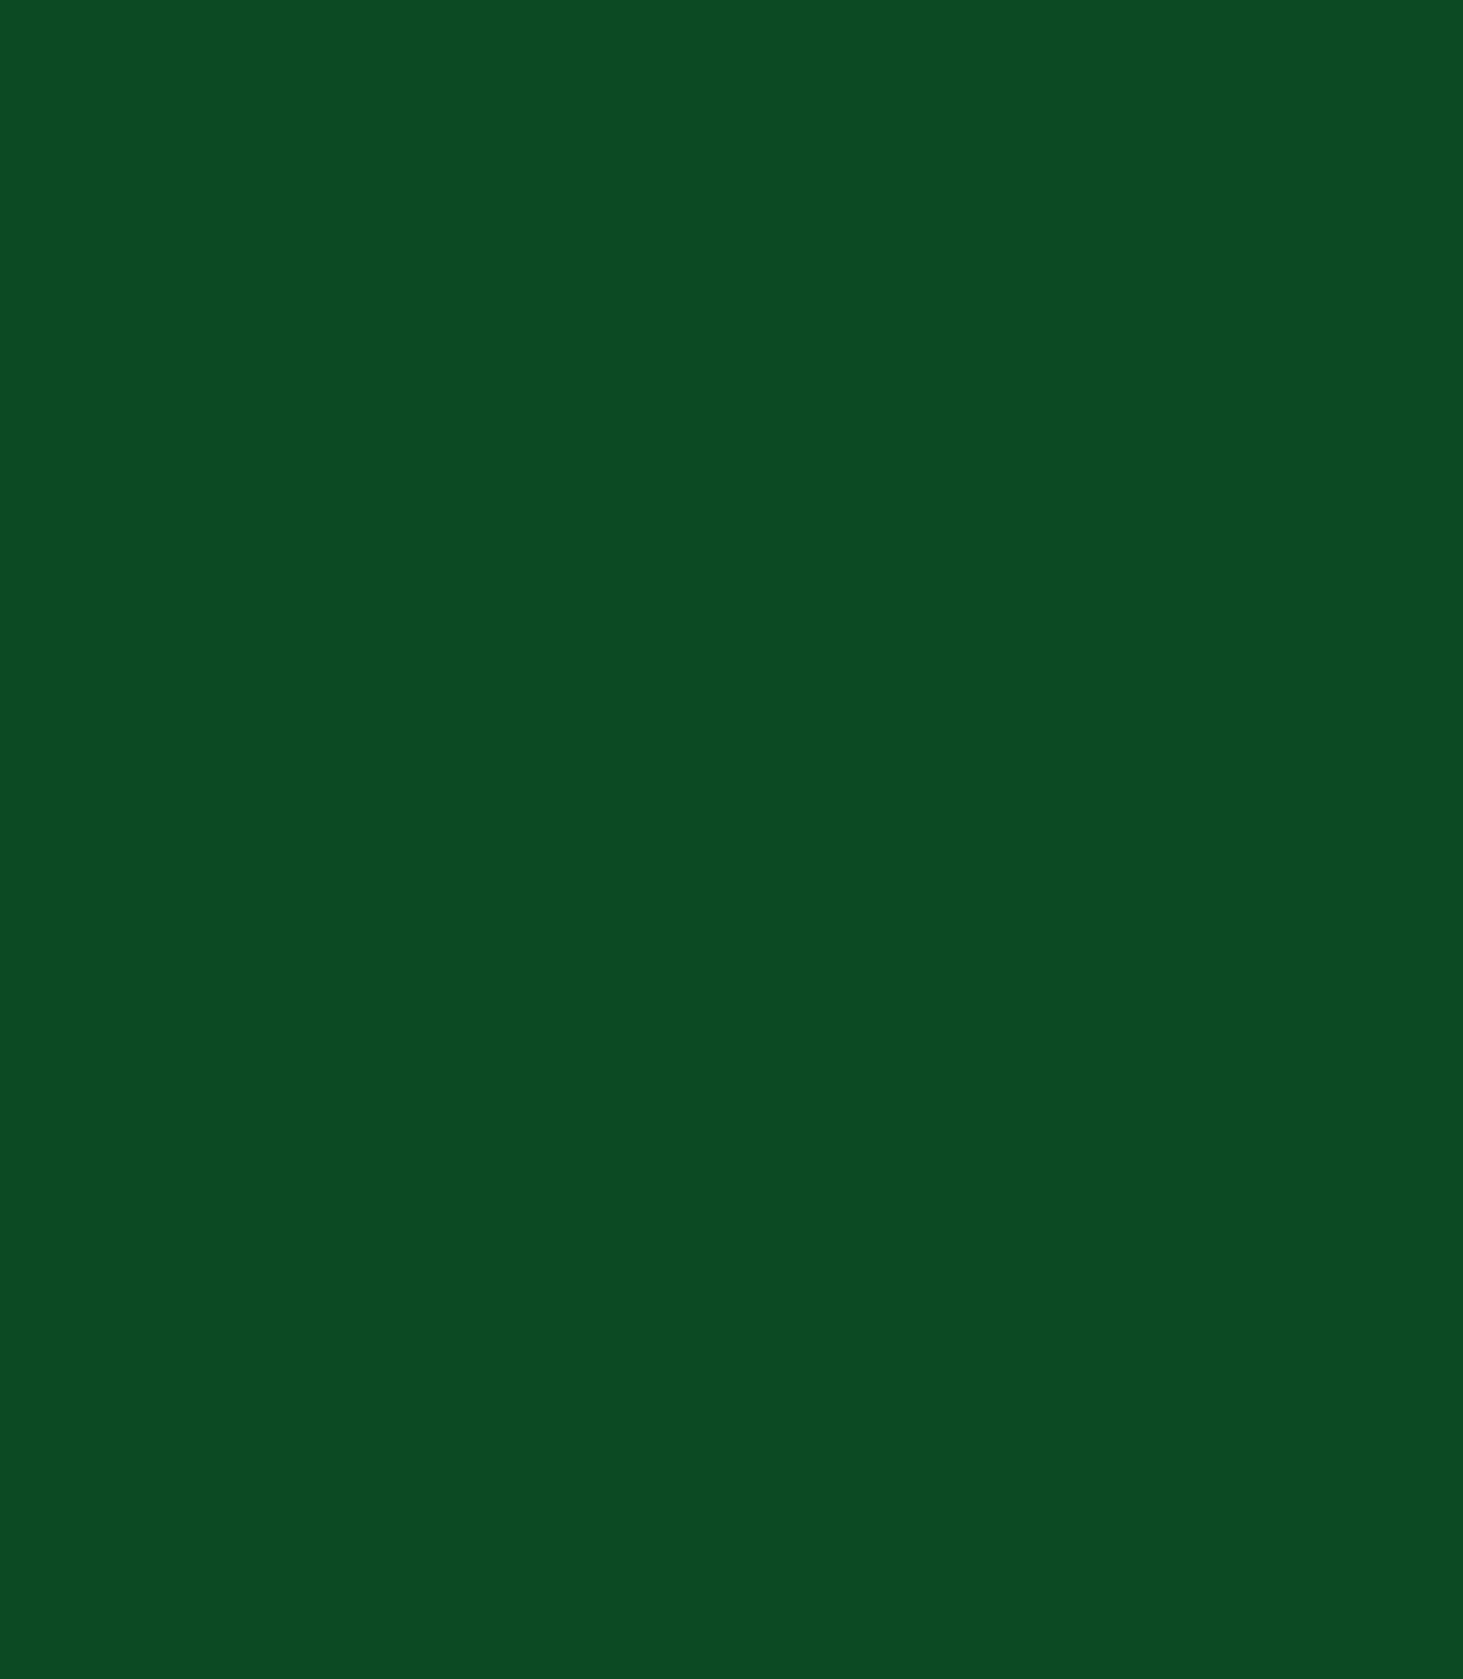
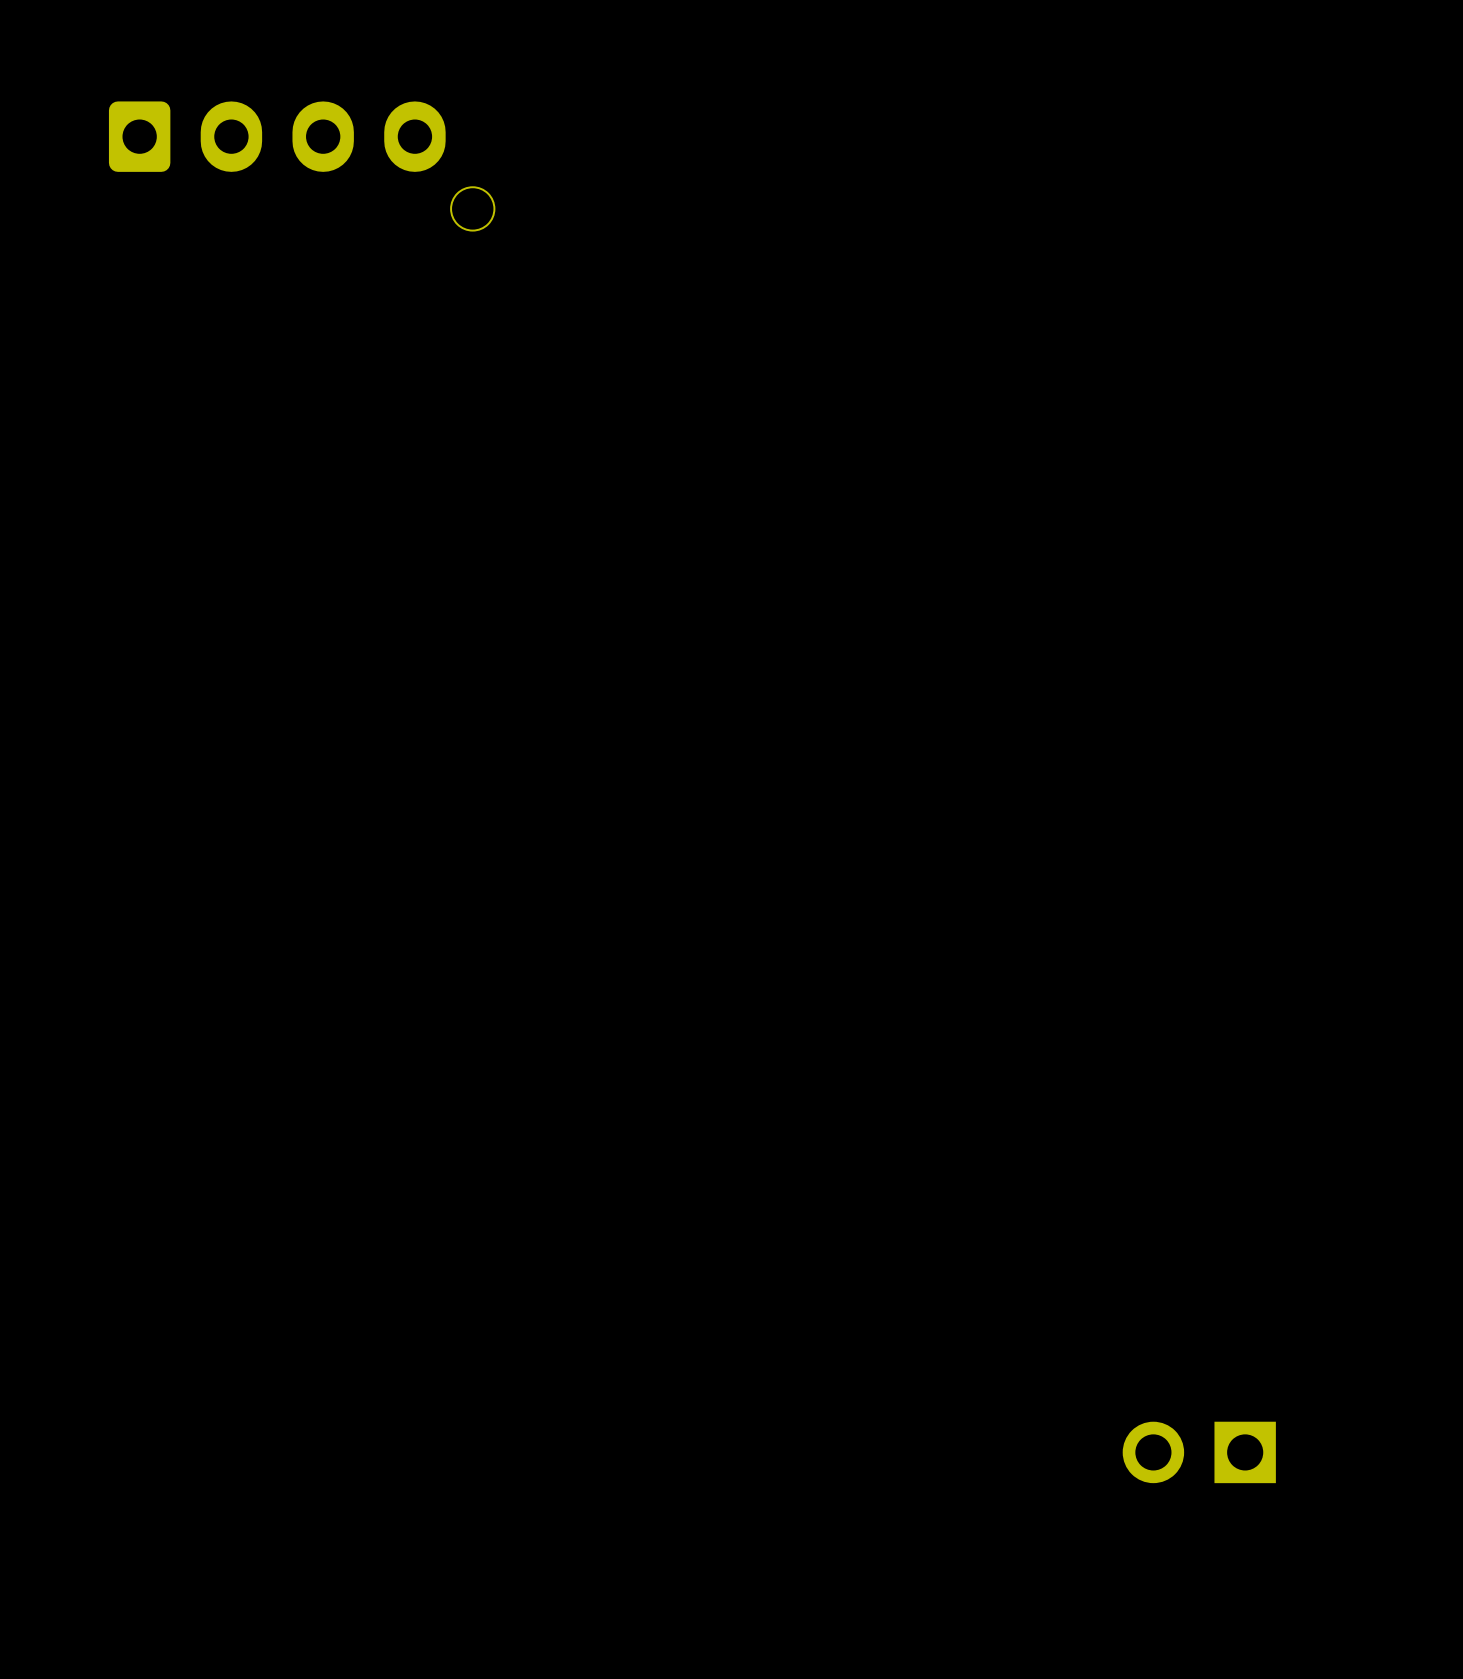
part: none -> (301, 166)
part: none -> (1199, 1452)

